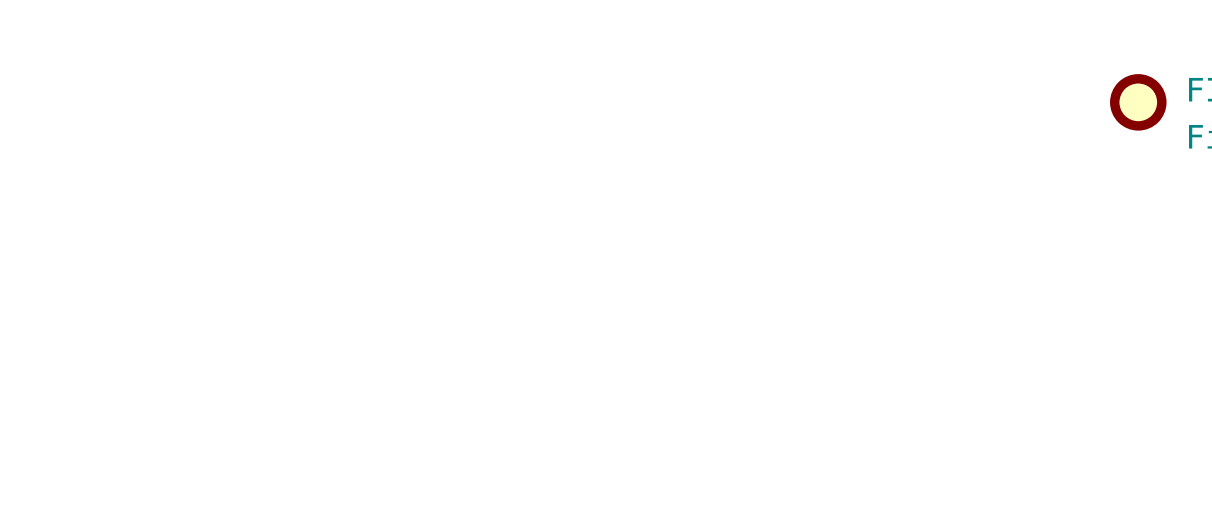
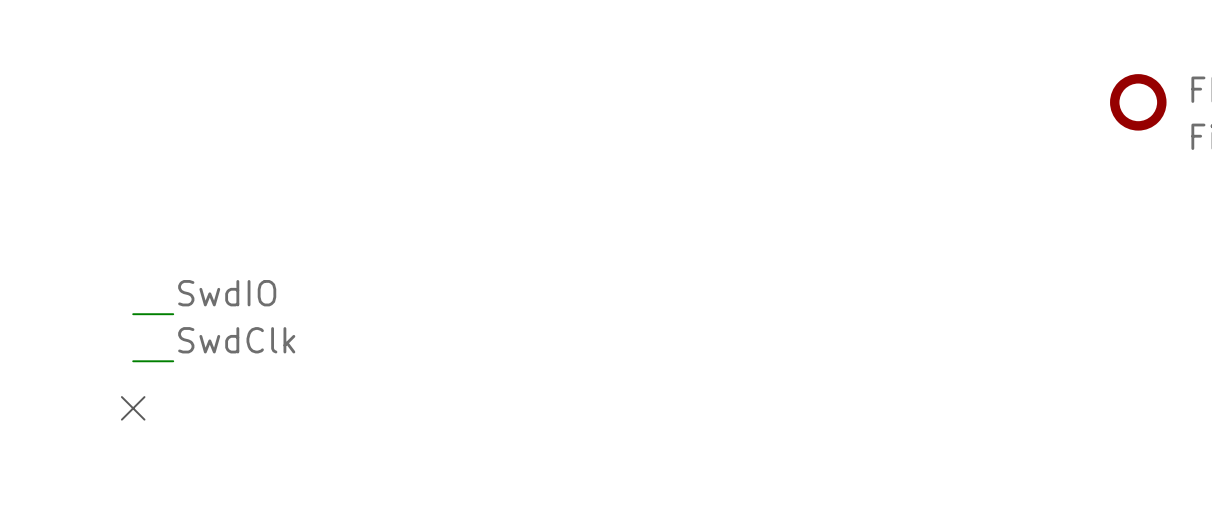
label: none -> SwdIO (227, 293)
wire: none -> (133, 314) (173, 314)
label: none -> SwdClk (236, 340)
wire: none -> (133, 361) (173, 361)
no-connect mark: none -> (133, 408)

